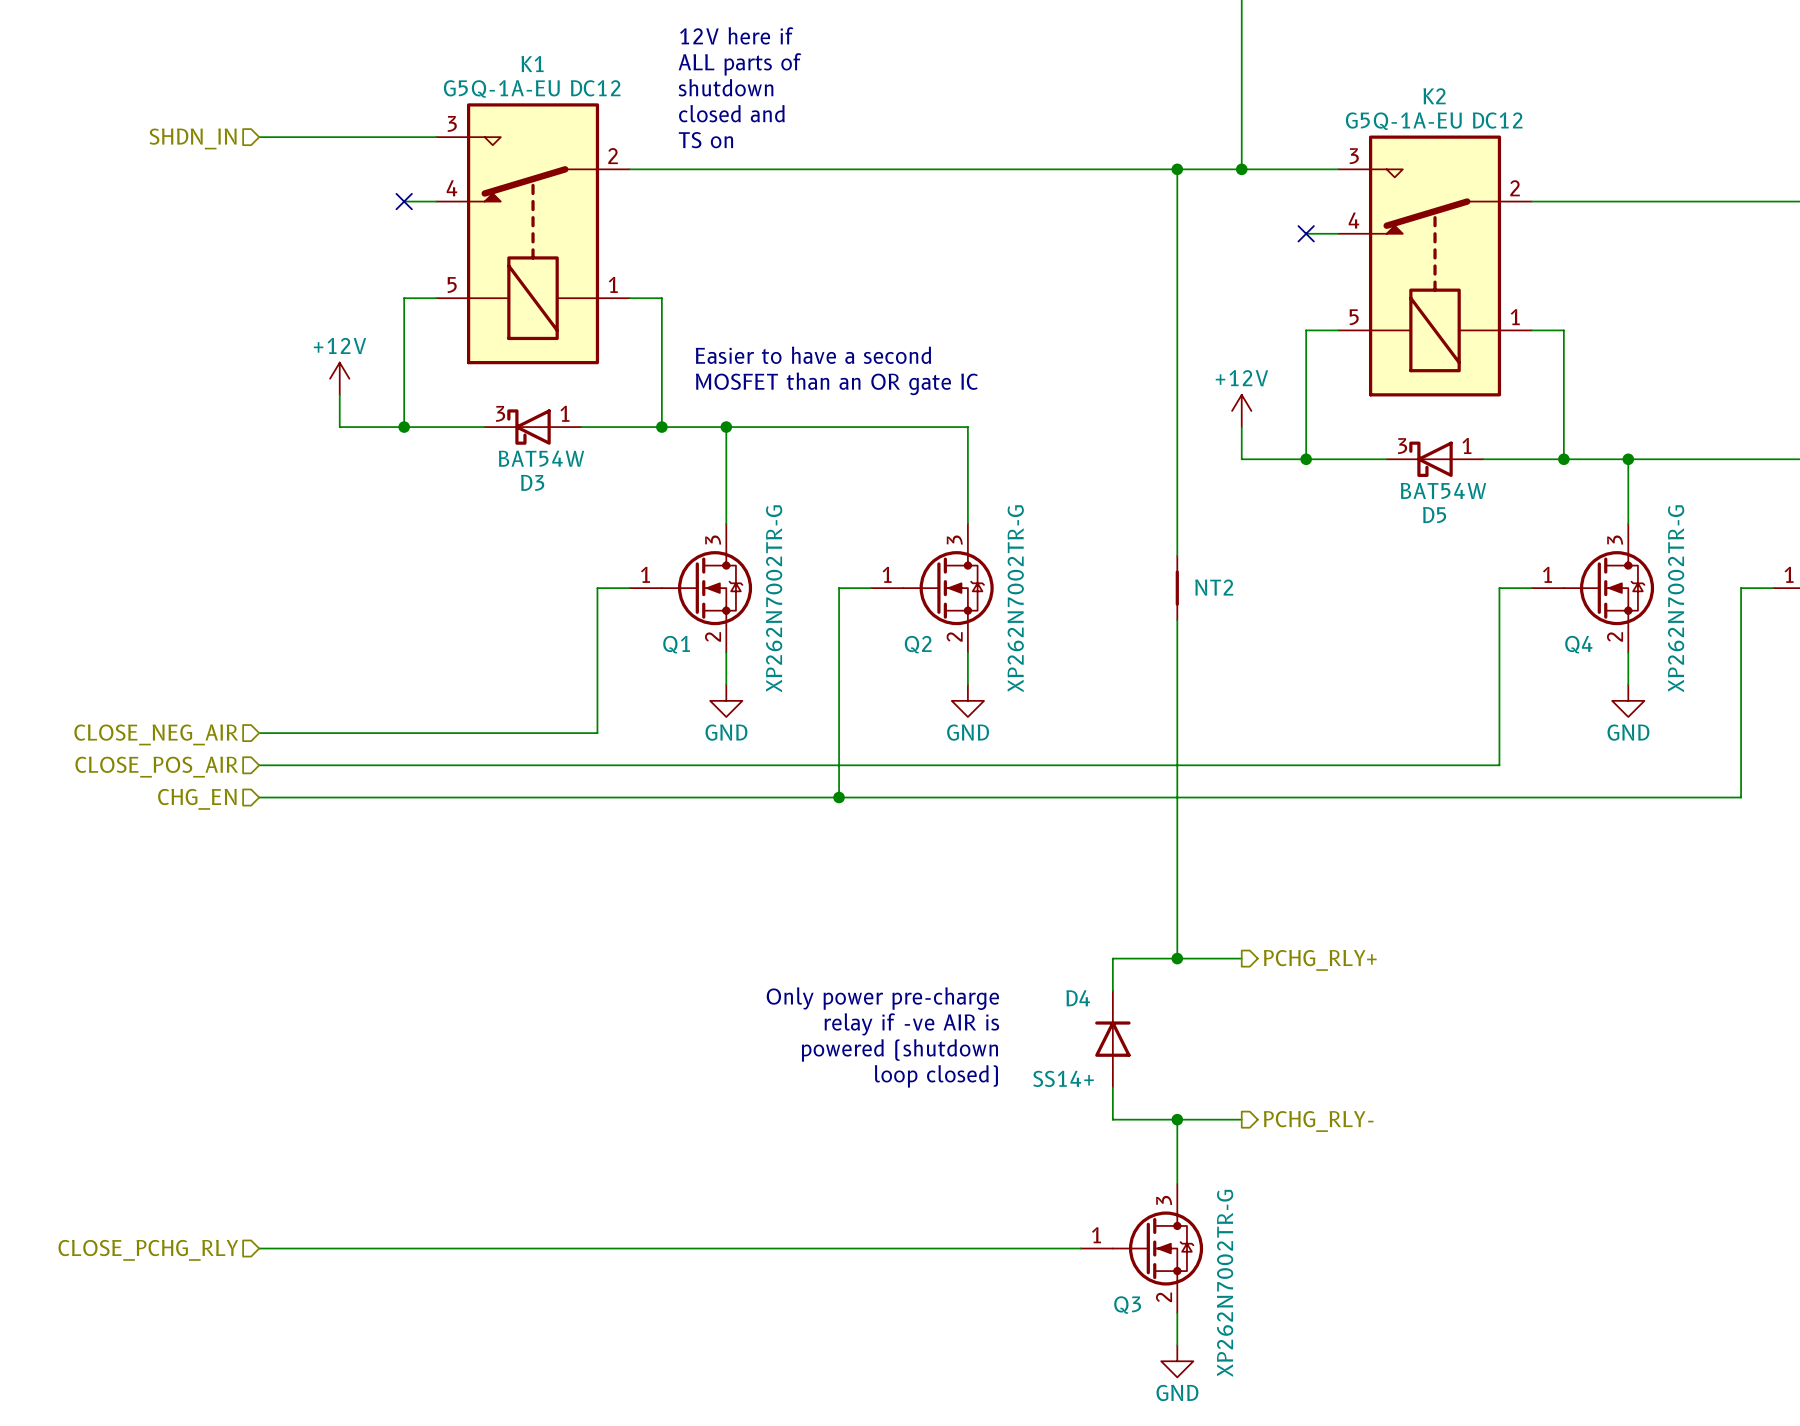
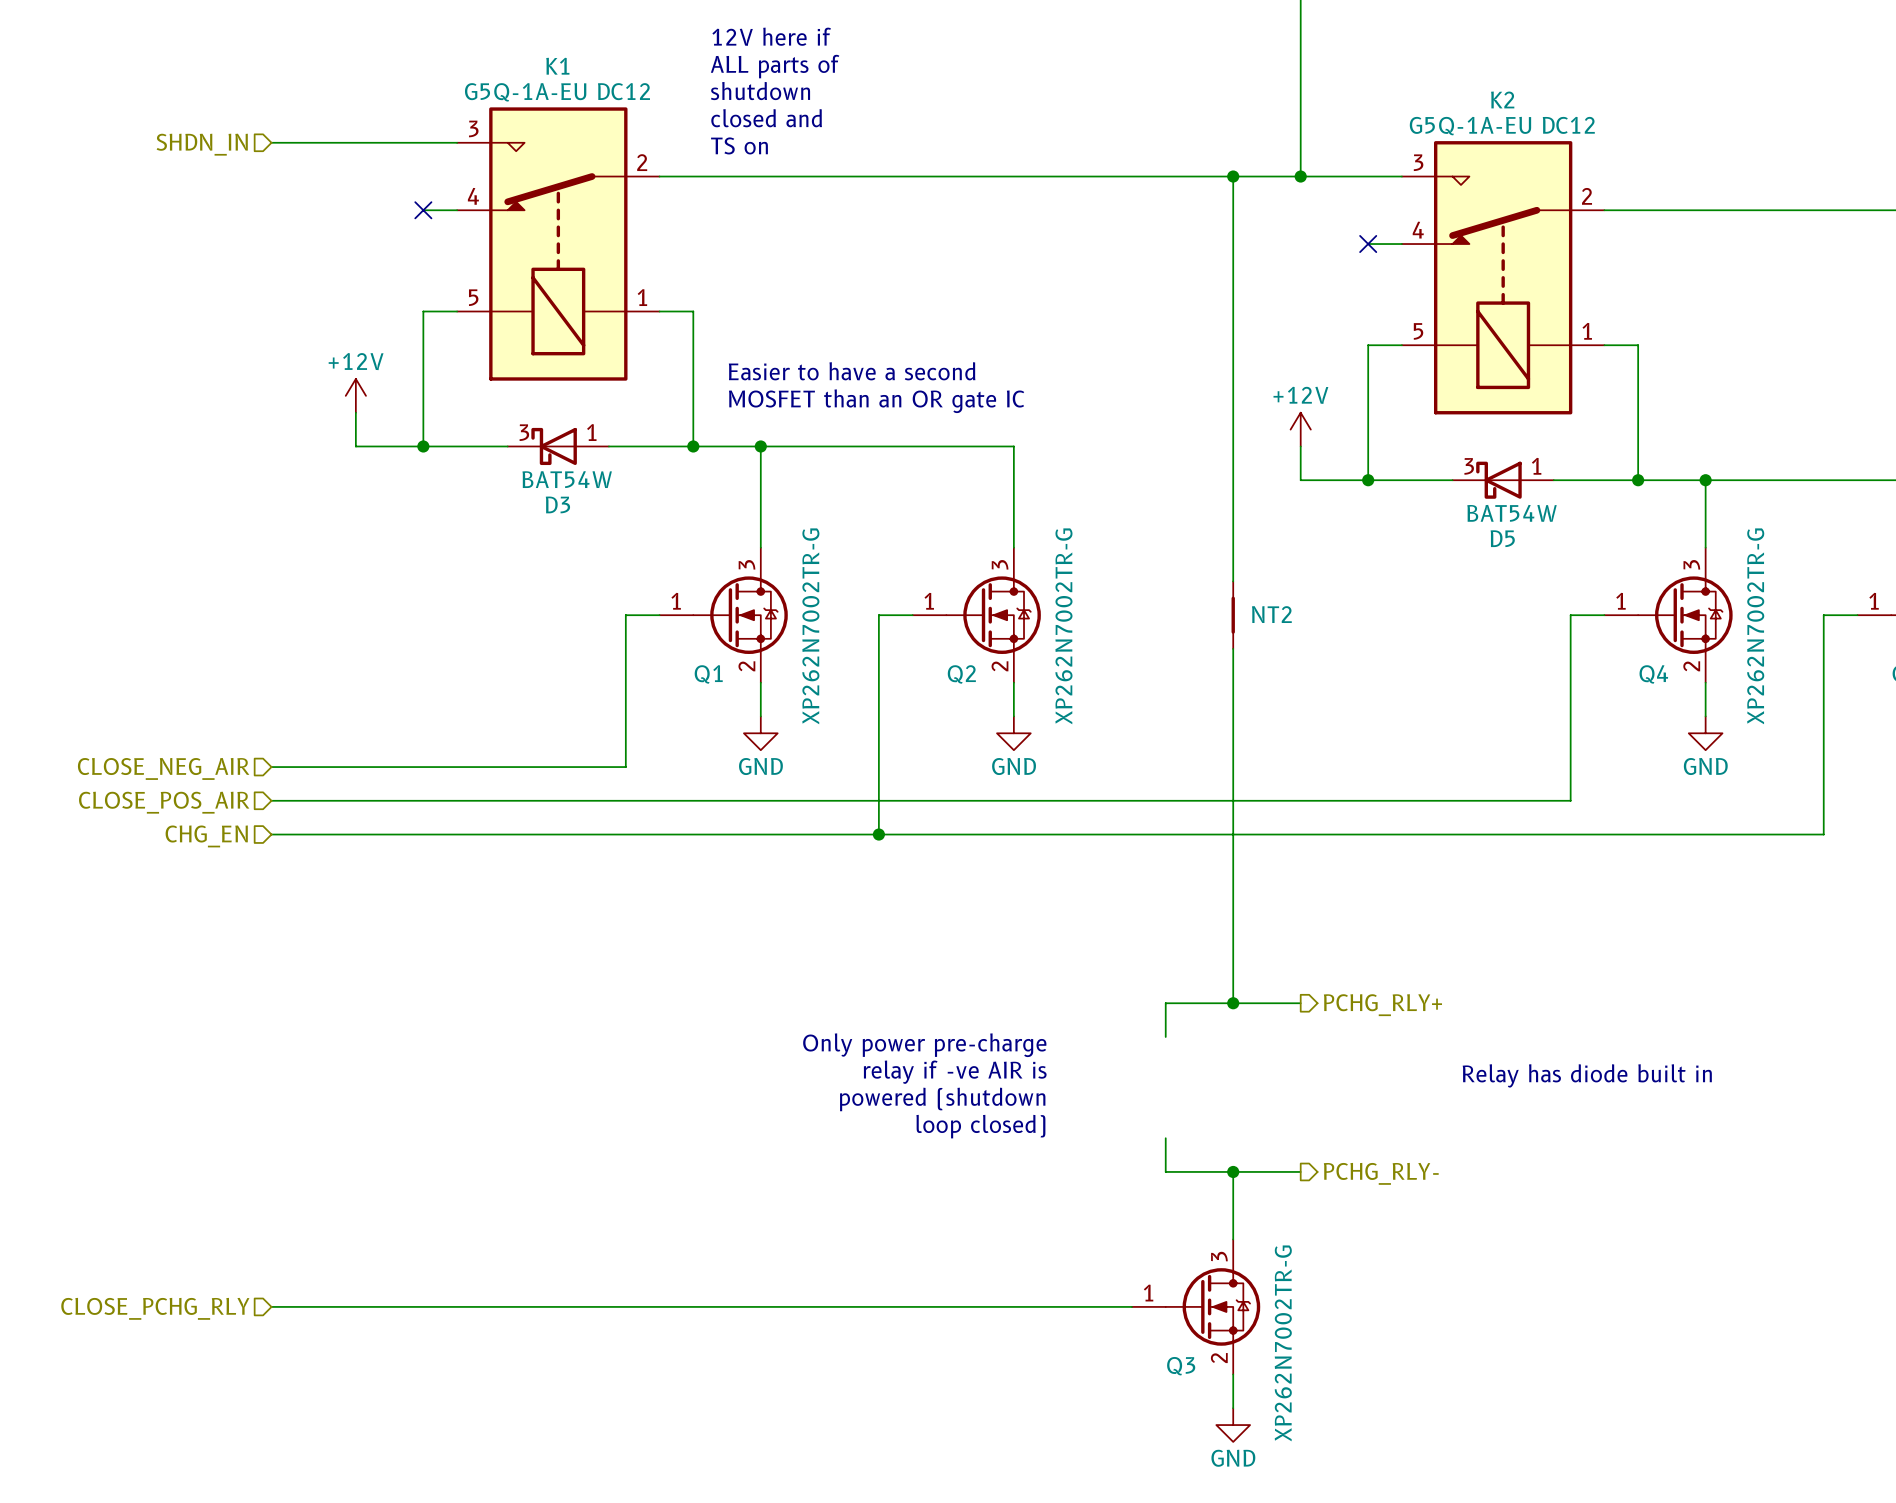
text: none -> Relay has diode built in (1587, 1075)
D4: SS14+ (1112, 1039) -> none

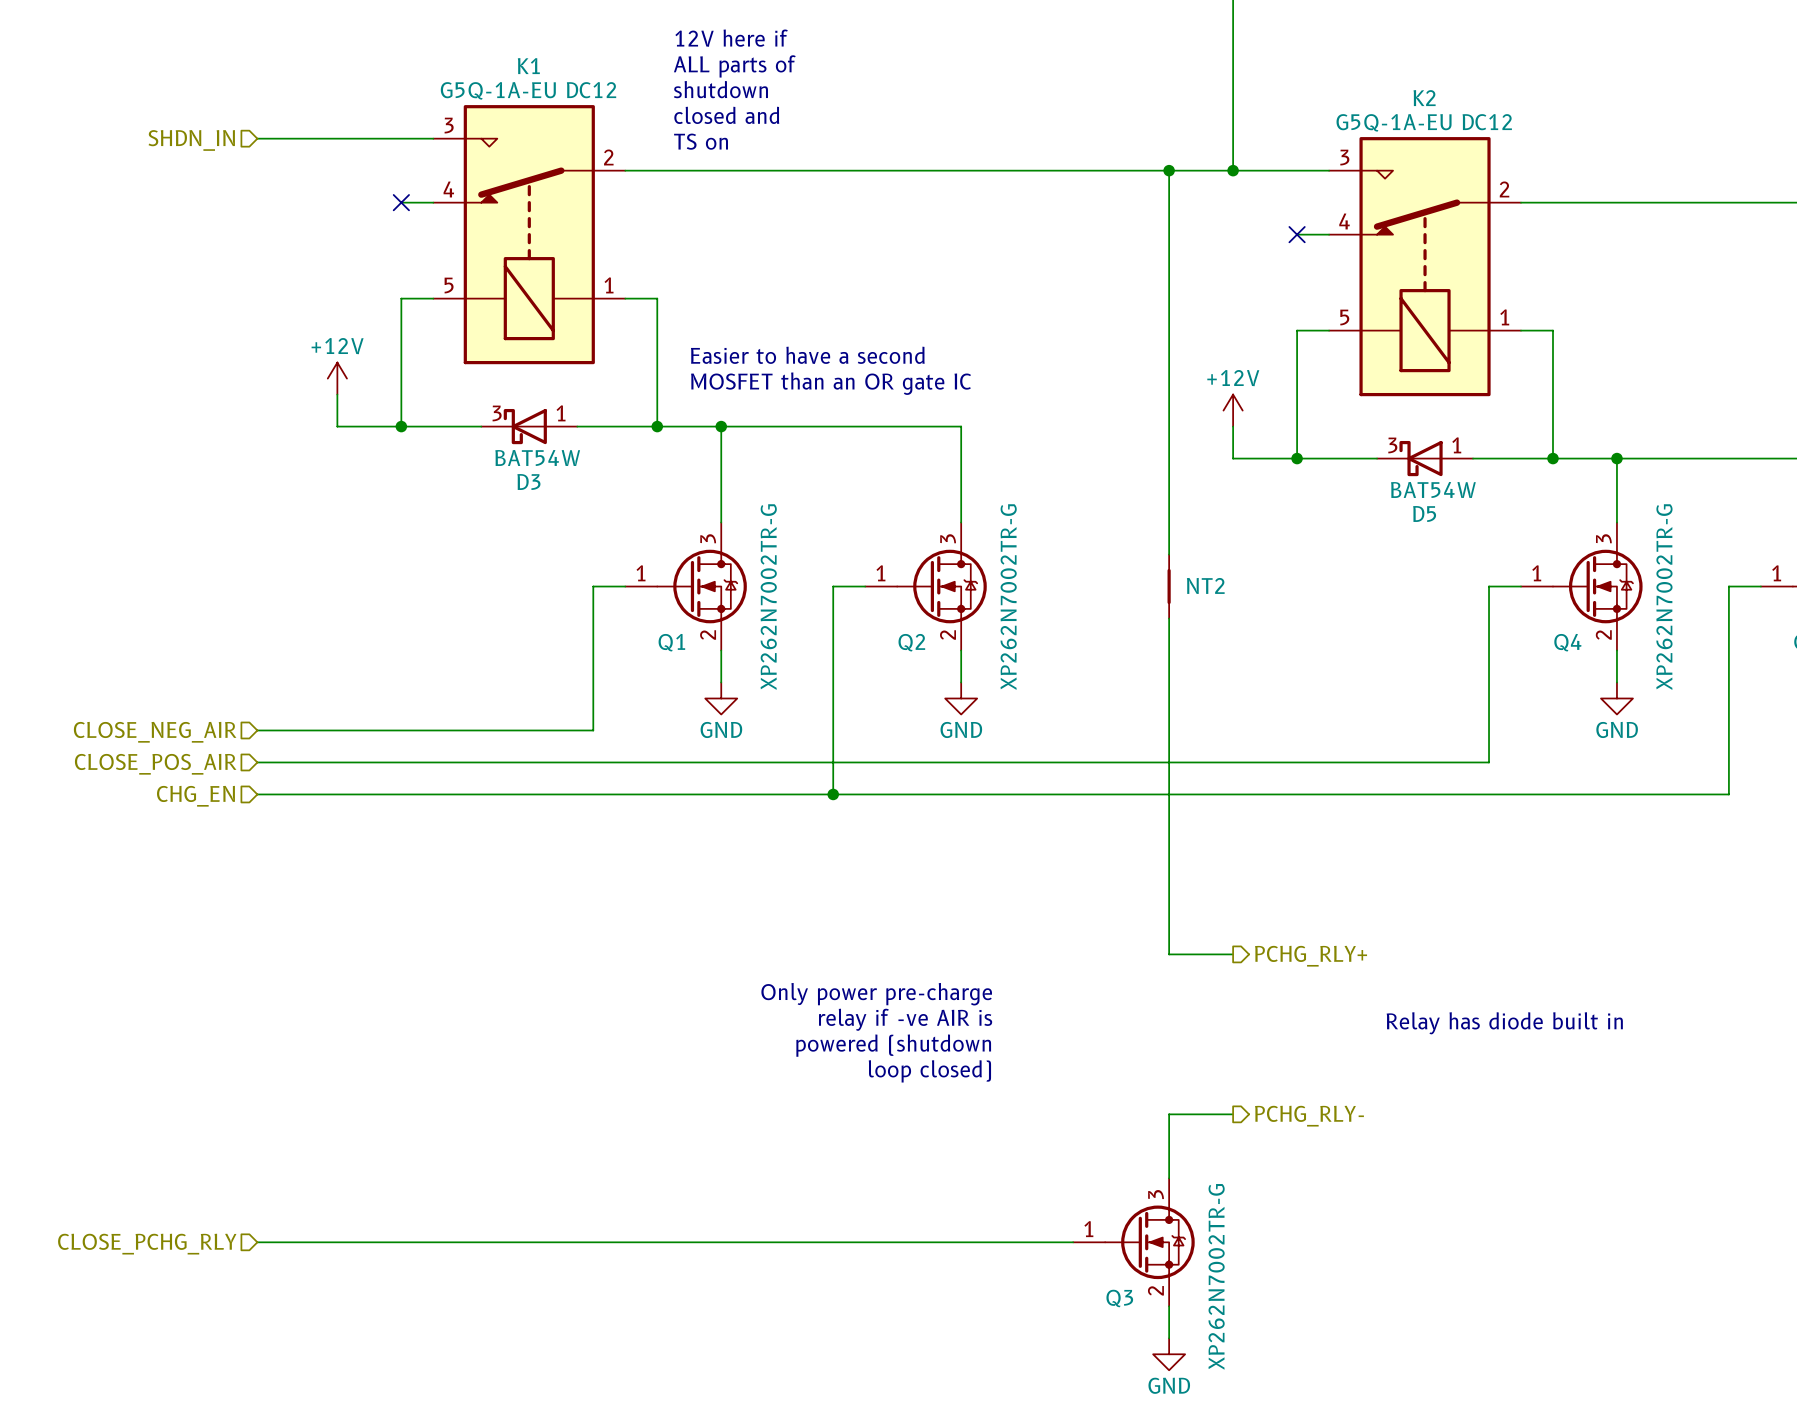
wire: (1233, 1003) (1165, 1003) (1165, 1036) -> none
junction: (1233, 1003) -> none
wire: (1165, 1138) (1165, 1171) (1233, 1171) -> none
junction: (1233, 1171) -> none

